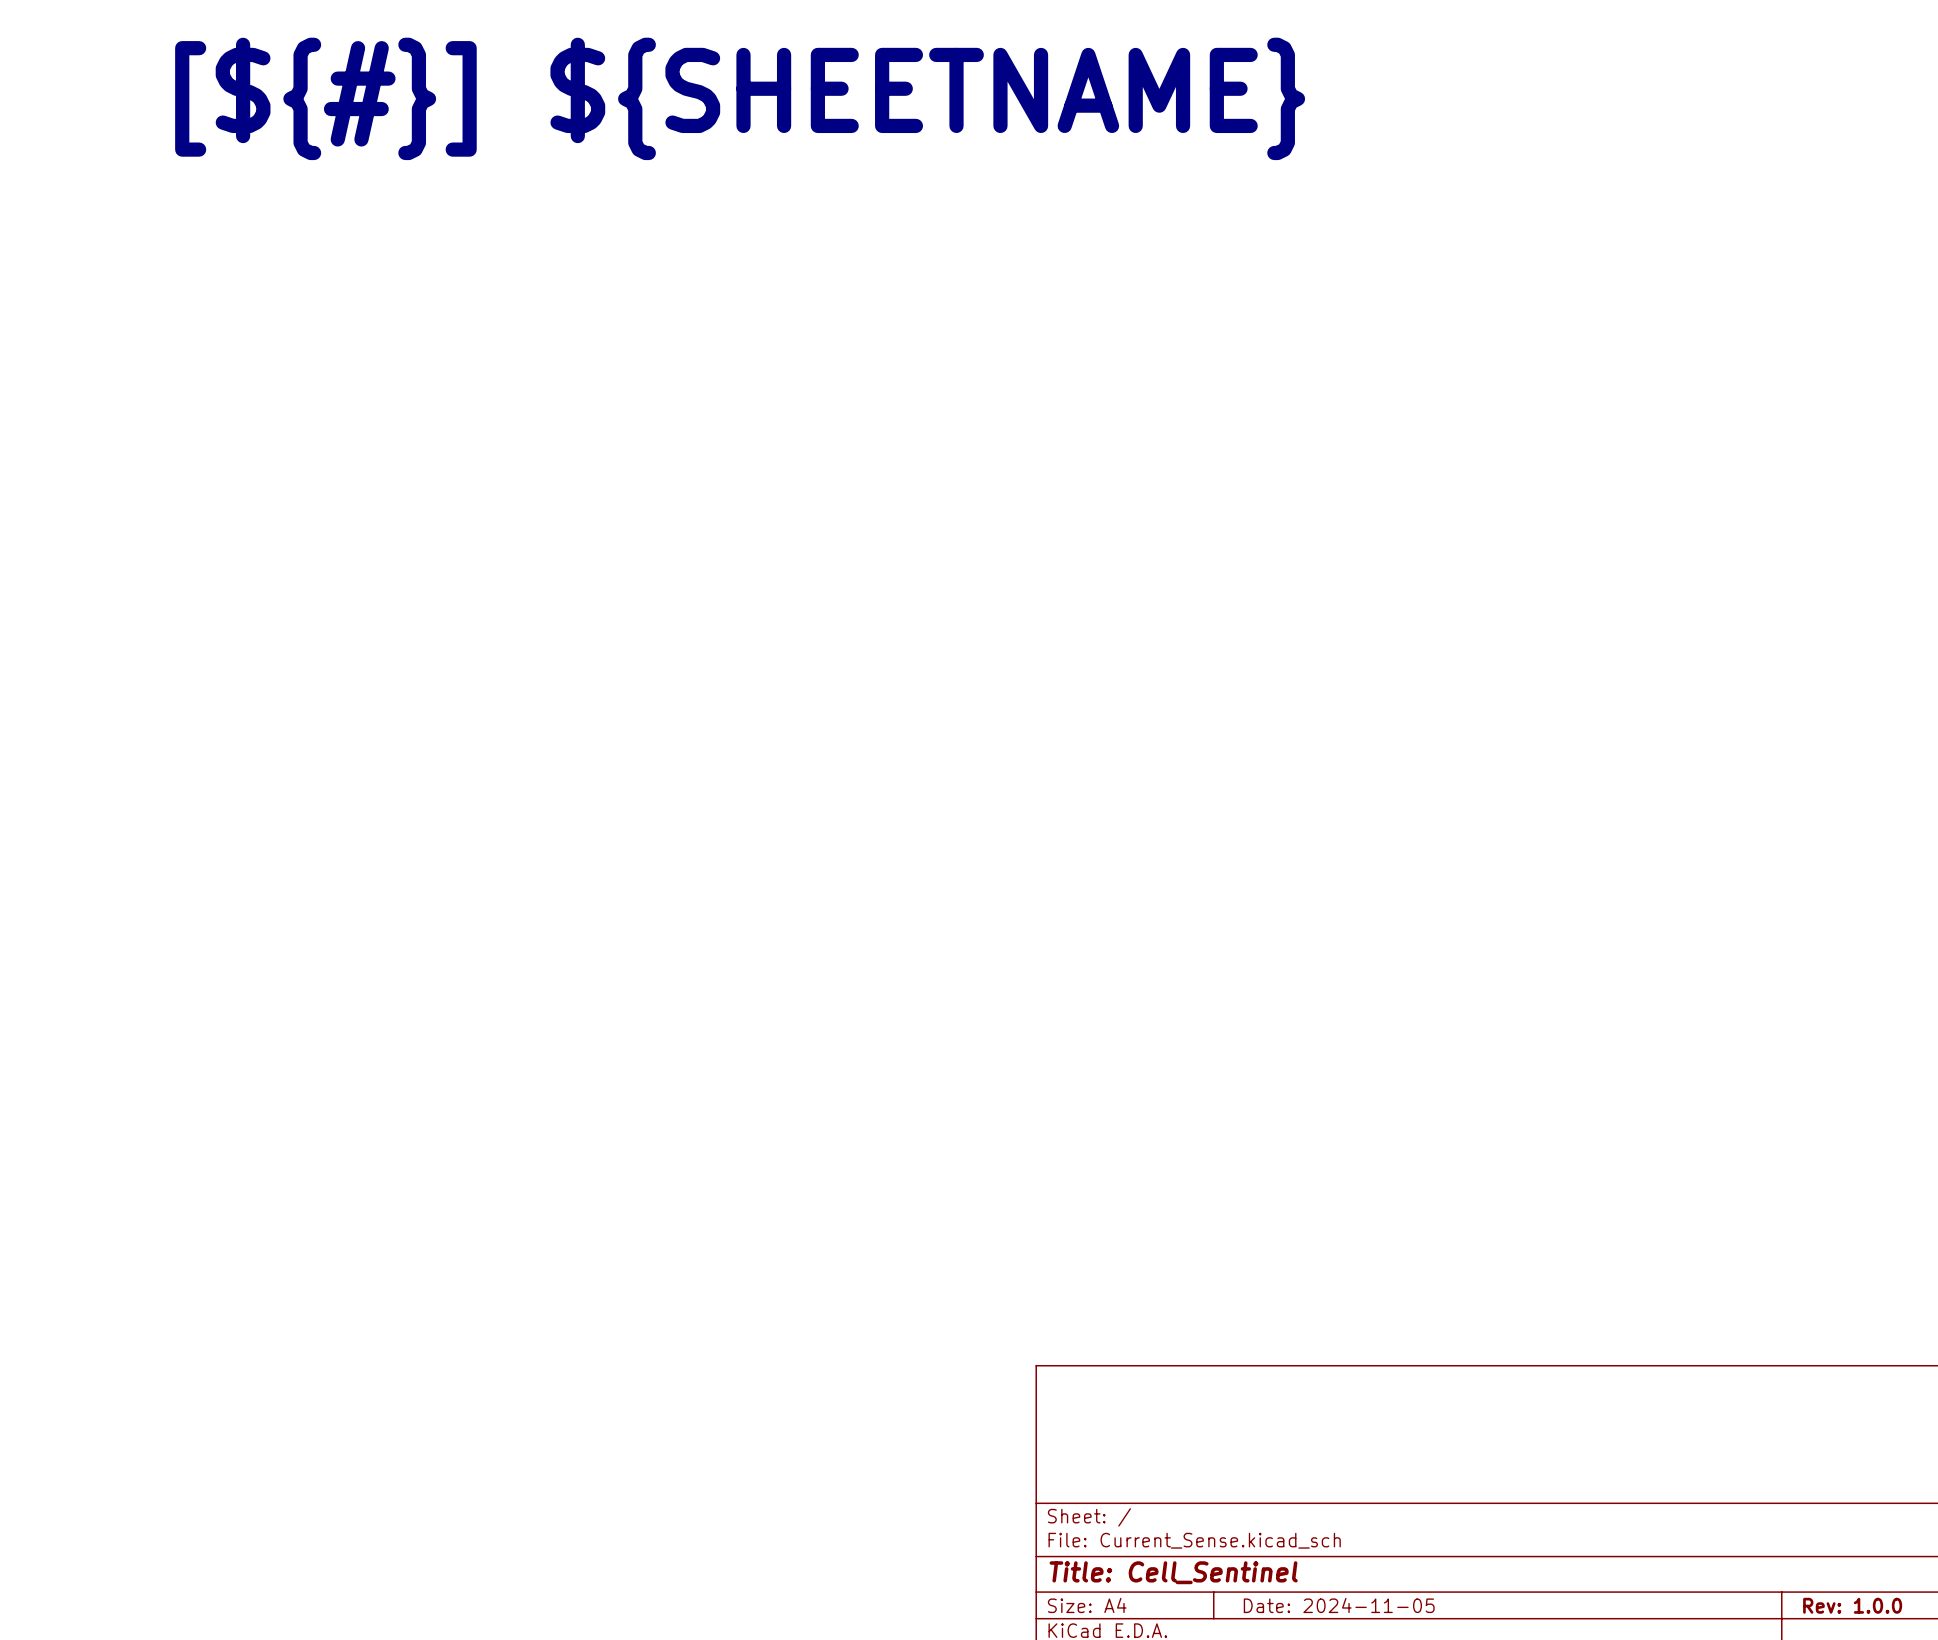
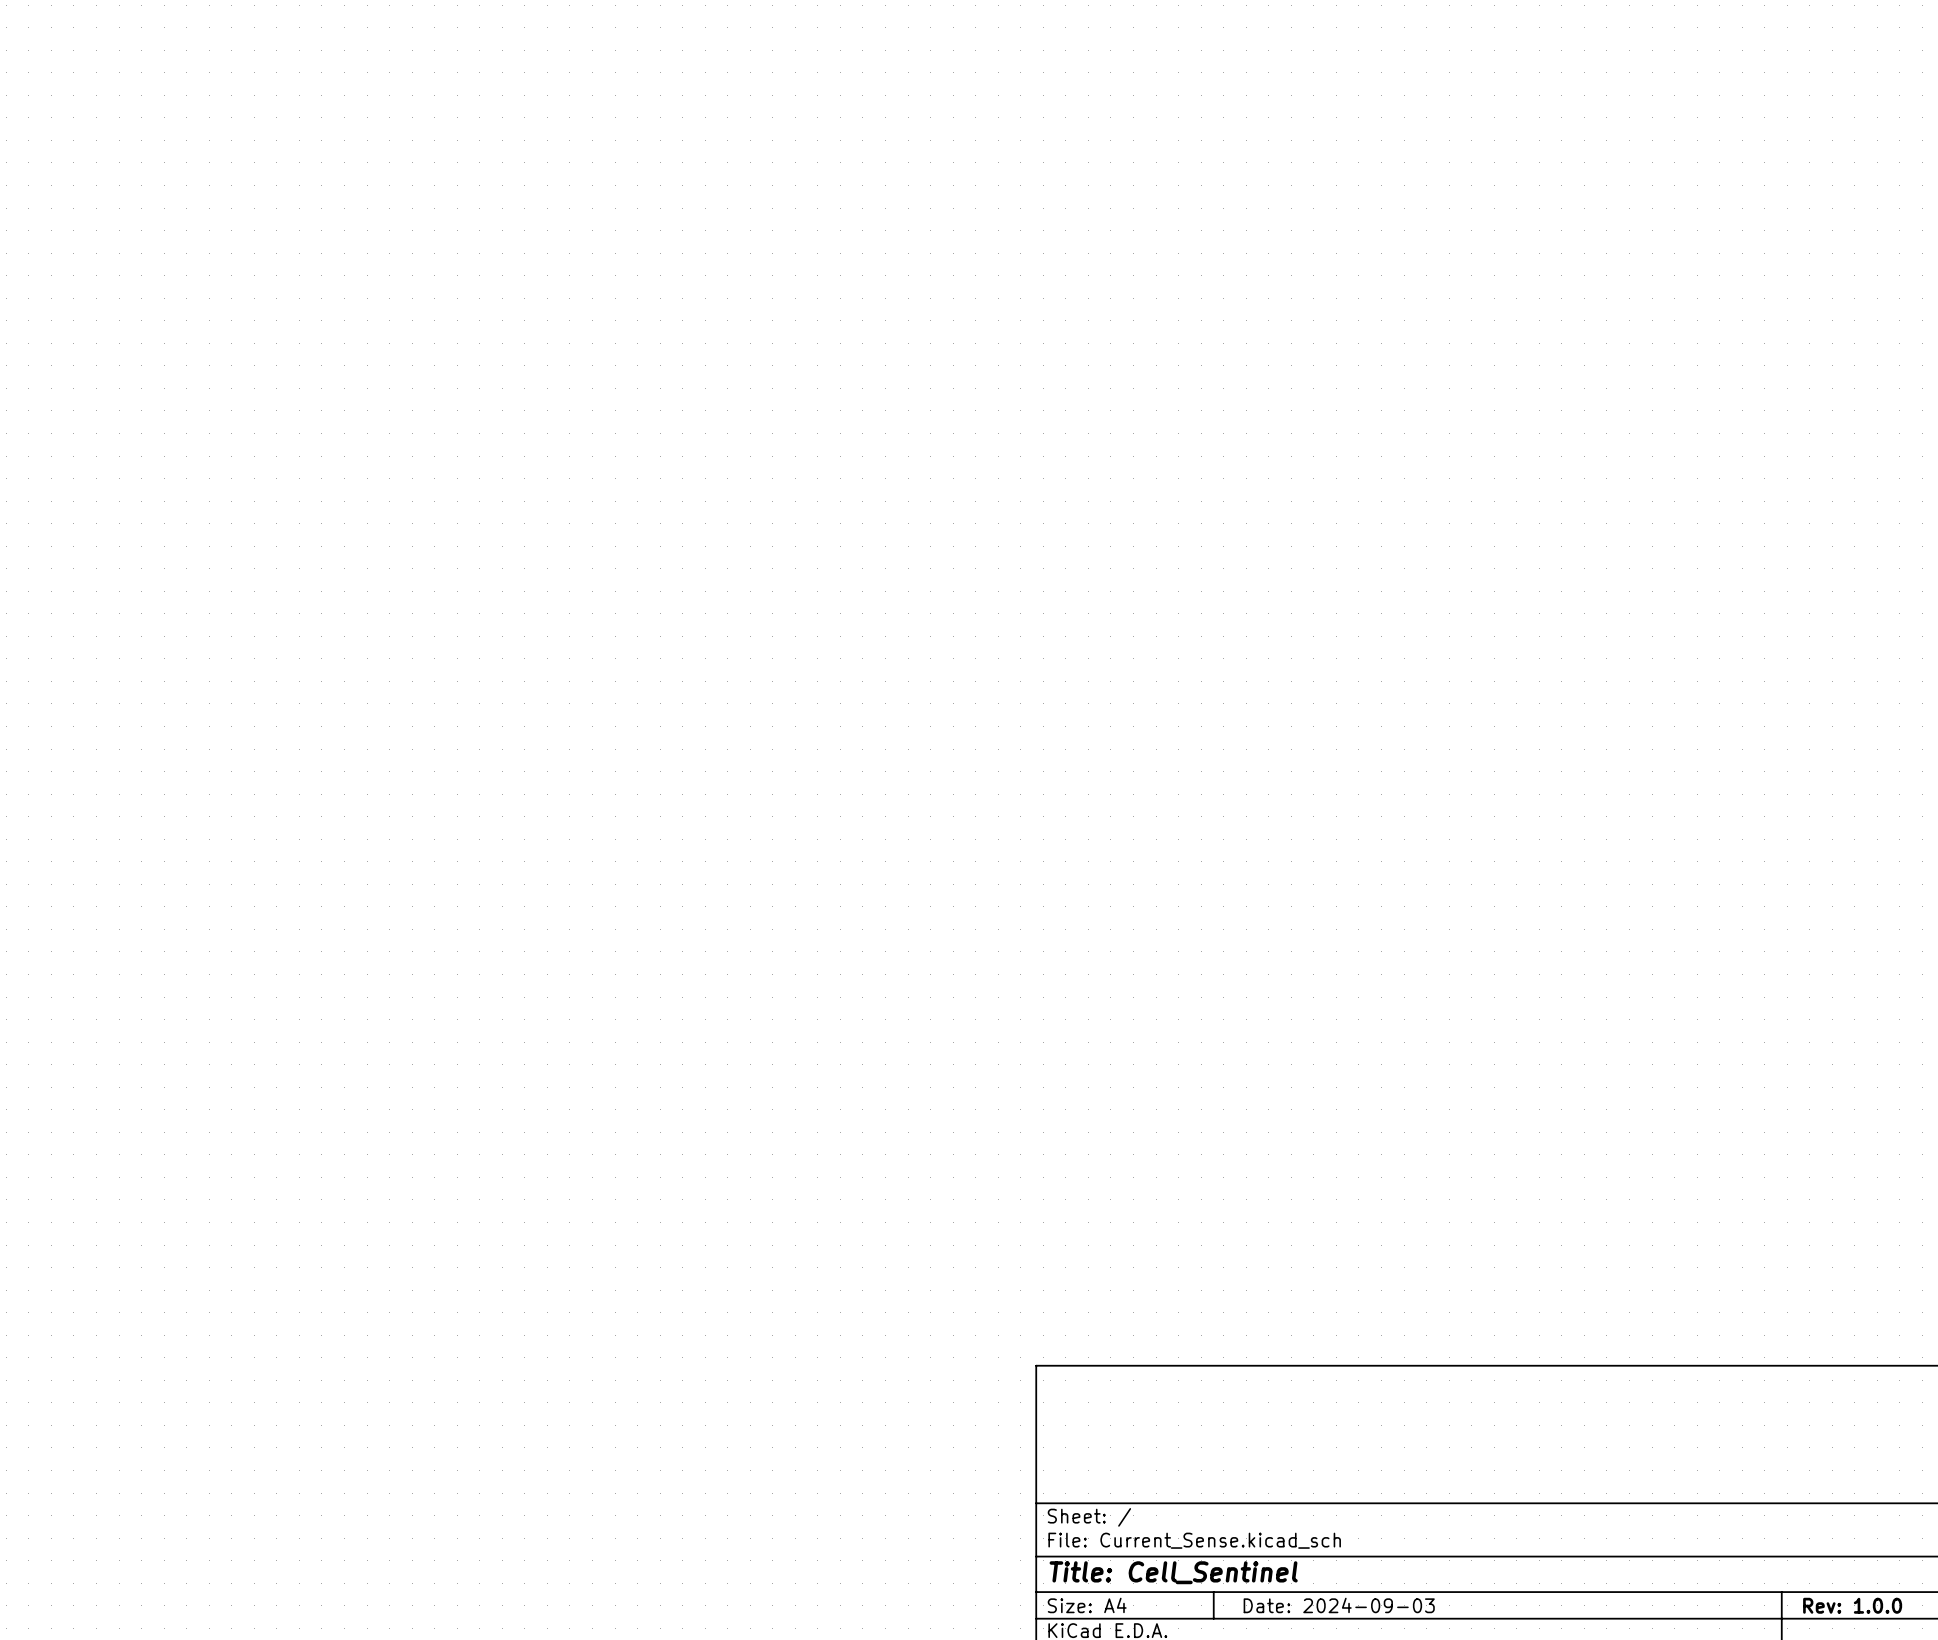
text: [${#}] ${SHEETNAME} (740, 98) -> none
title block: Date: 2024-11-05 (1339, 1605) -> Date: 2024-09-03 (1339, 1605)

